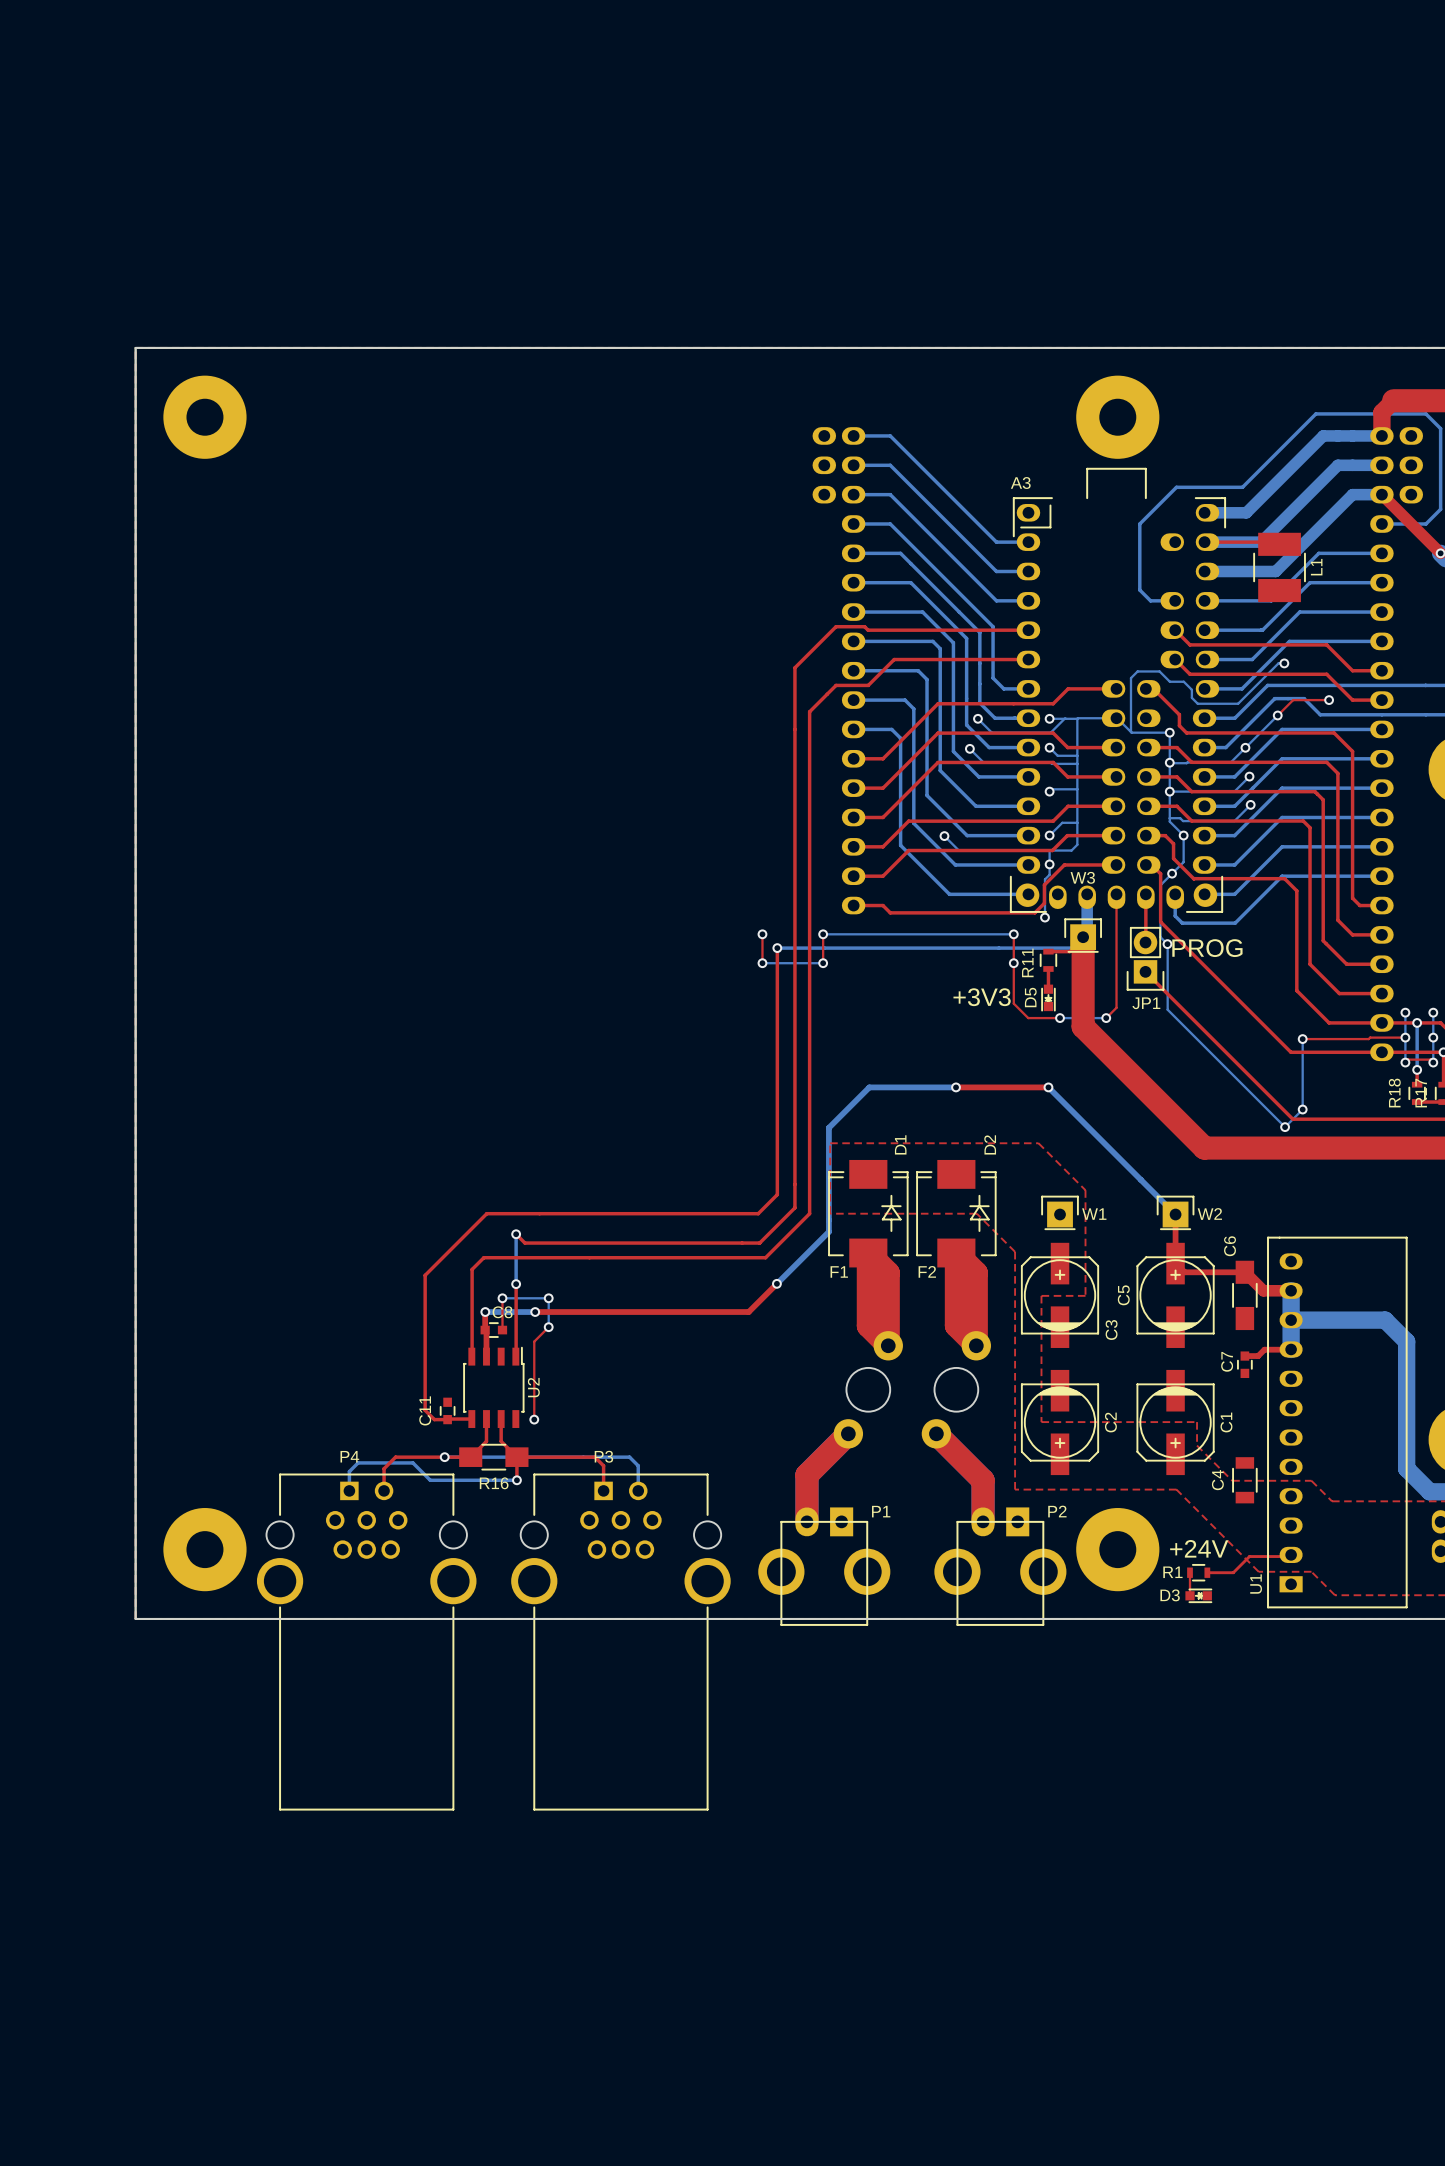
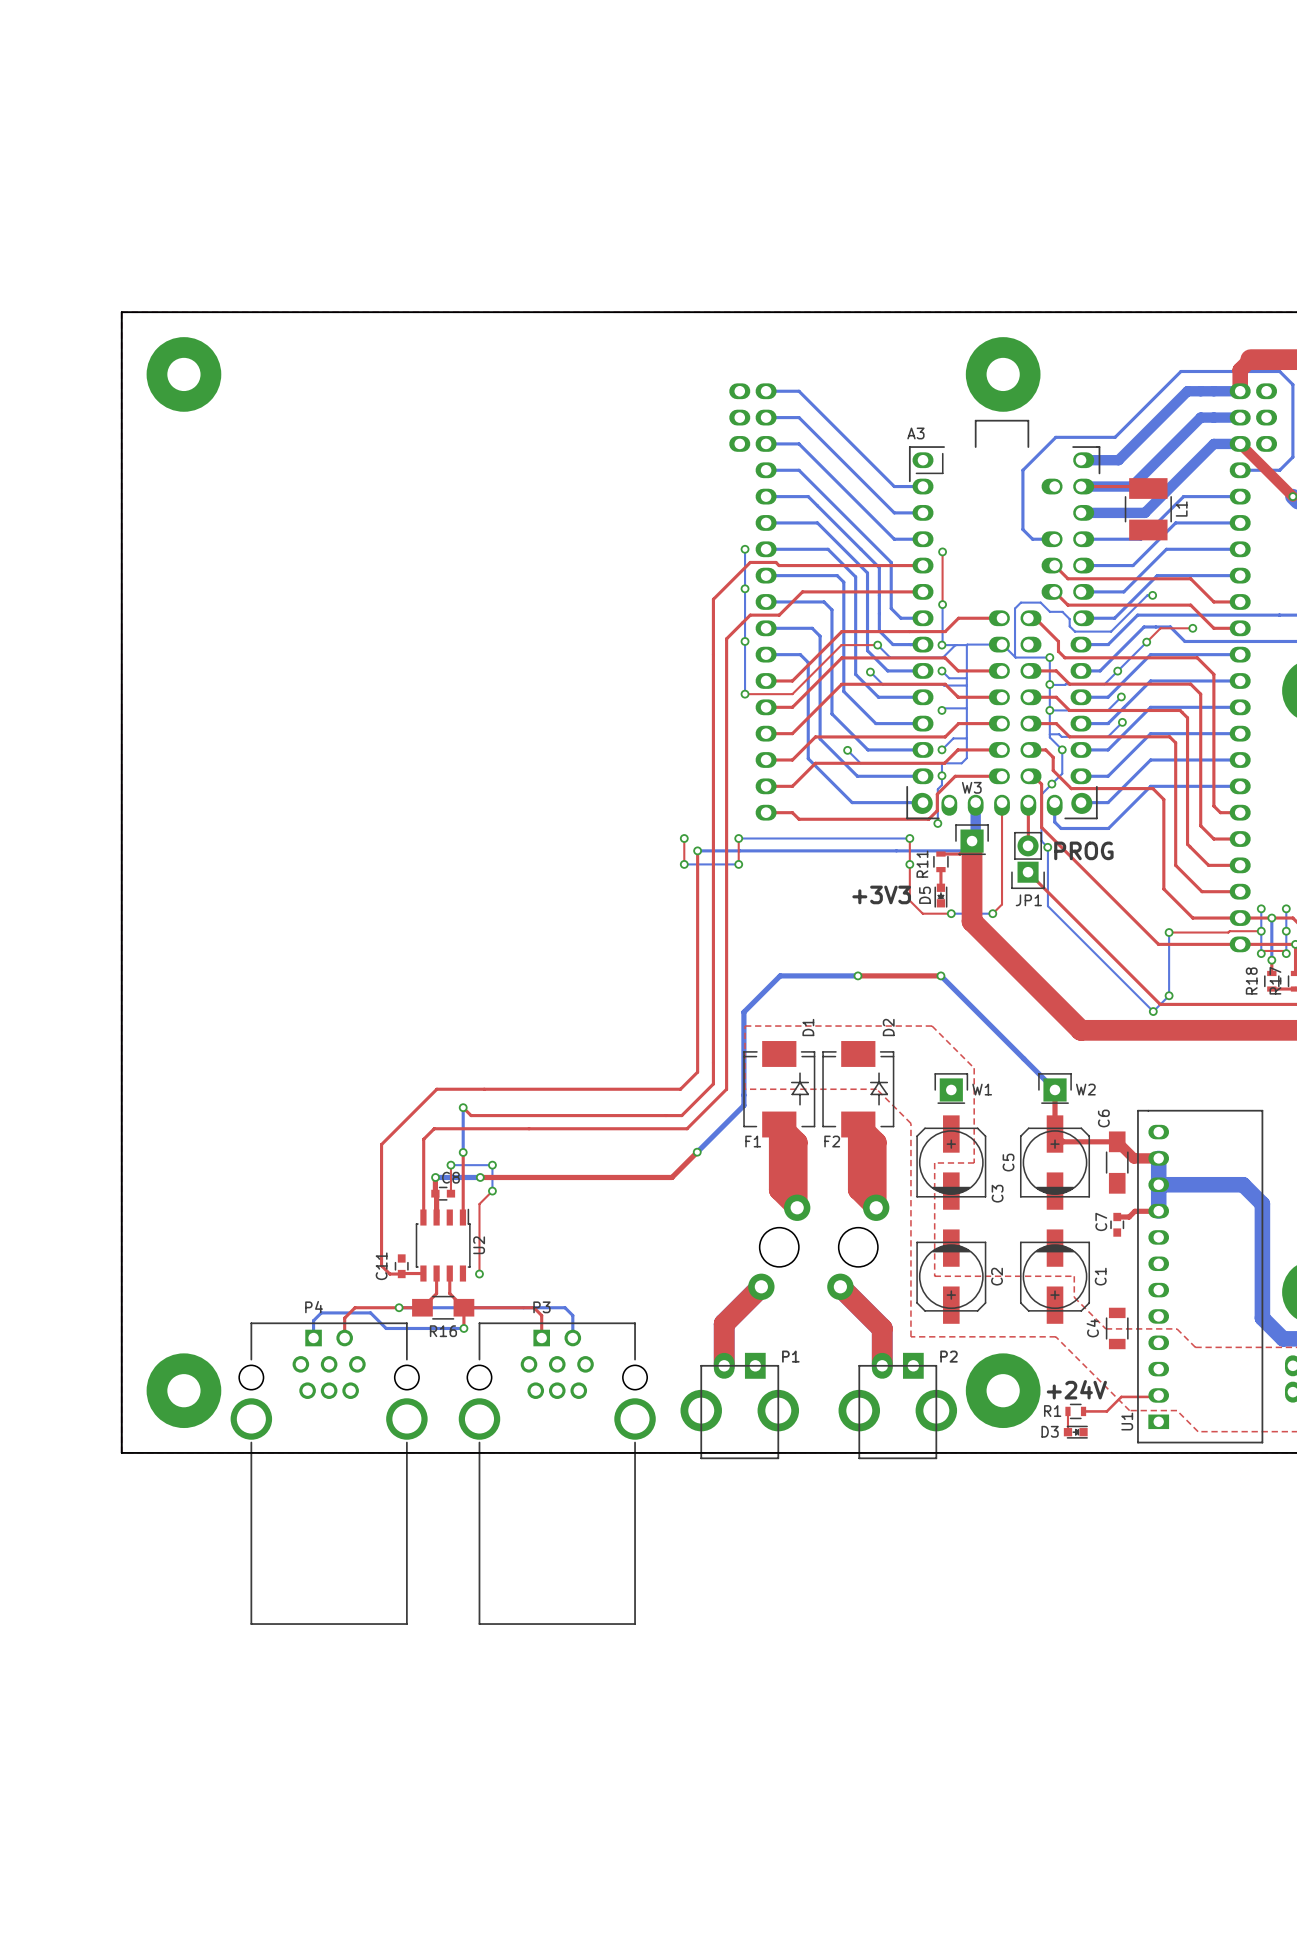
bottom track: none -> (745, 549) (745, 694)
via: none -> (745, 549)
top track: none -> (942, 551) (942, 604)
via: none -> (942, 551)
via: none -> (745, 588)
bottom track: none -> (942, 604) (942, 645)
via: none -> (942, 604)
via: none -> (745, 641)
top track: none -> (877, 645) (841, 645) (792, 694) (745, 694)
via: none -> (745, 694)

